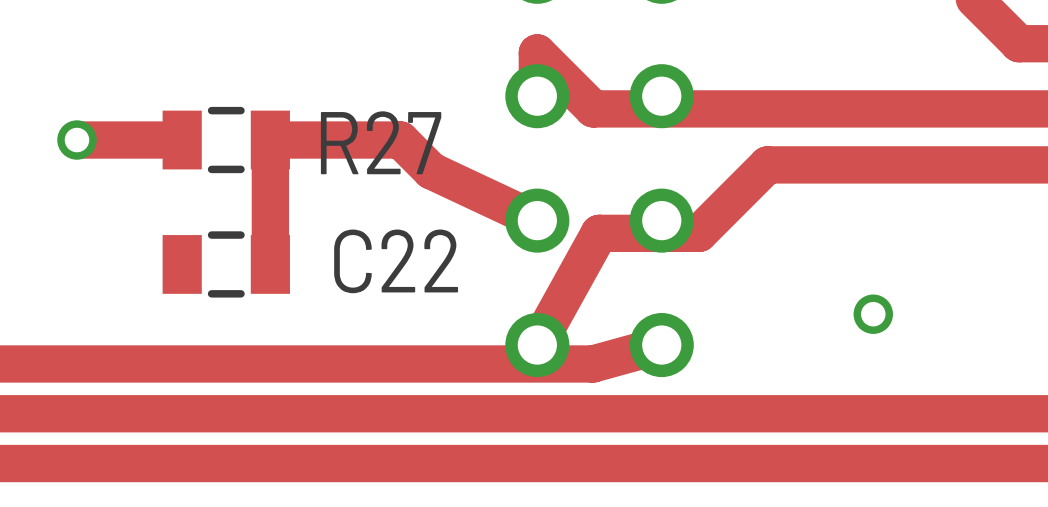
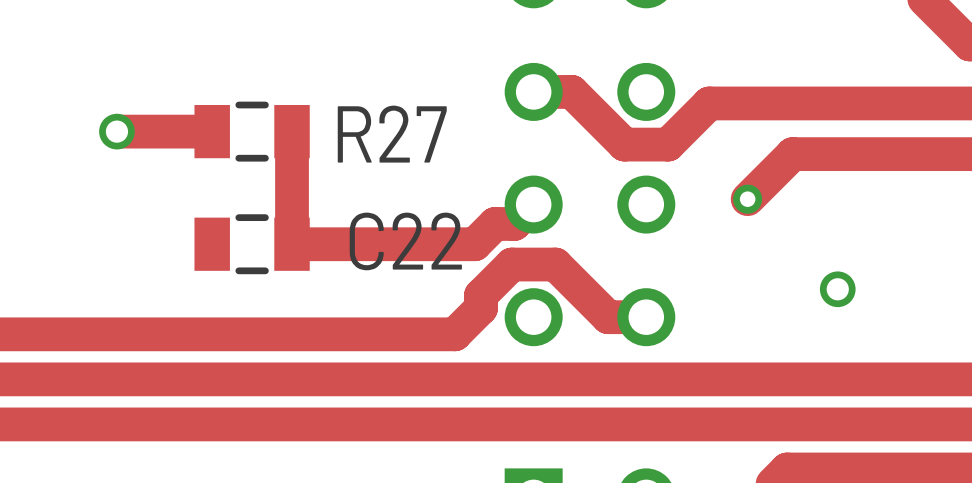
track: (537, 96) (537, 52) (593, 108) (731, 108) -> (533, 91) (571, 91) (624, 144) (668, 144) (709, 103)
track: (270, 140) (400, 140) (431, 170) (537, 220) -> (292, 244) (474, 244) (495, 223) (514, 223) (533, 204)
track: (823, 164) (767, 164) (699, 233) (599, 233) (537, 345) -> (792, 154) (747, 199)
via: none -> (747, 199)
track: (661, 345) (593, 363) (450, 363) -> (646, 317) (608, 317) (555, 264) (511, 264) (481, 295) (481, 308) (454, 334)

